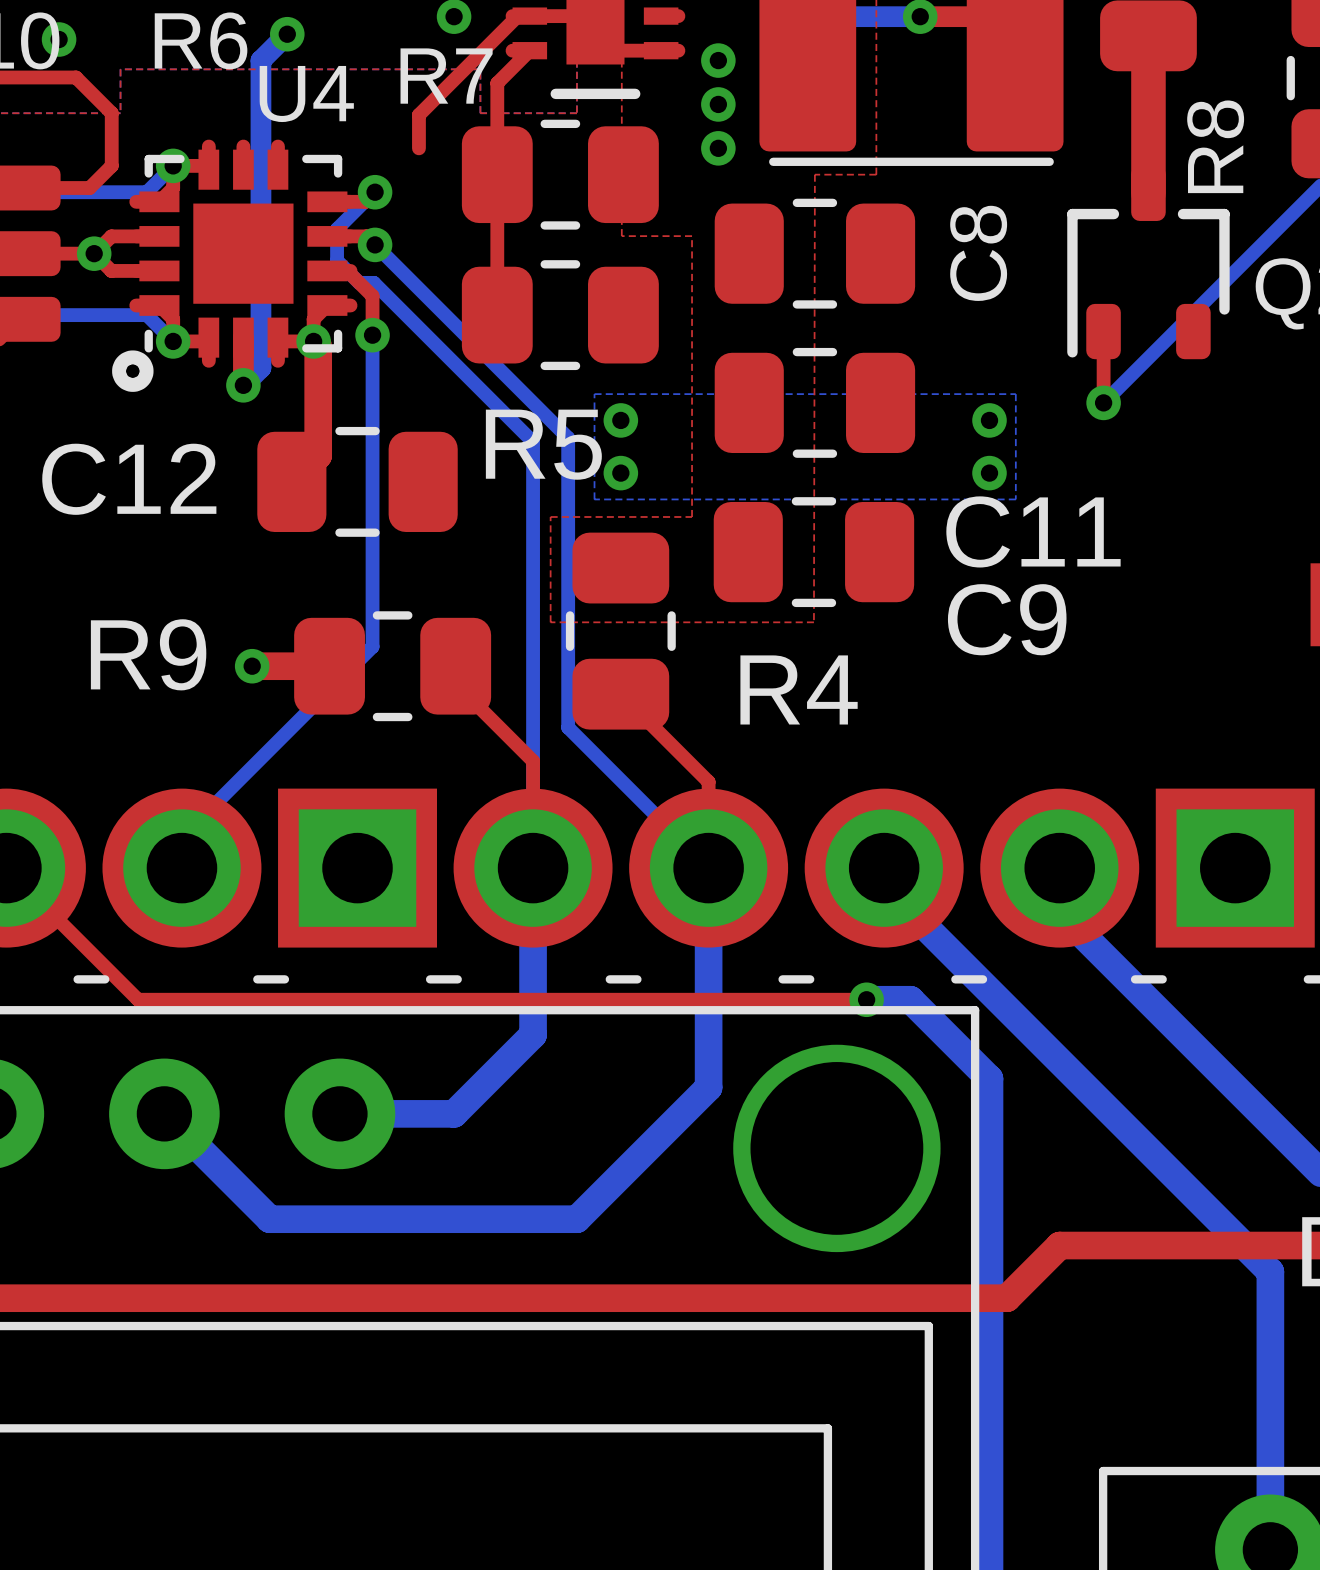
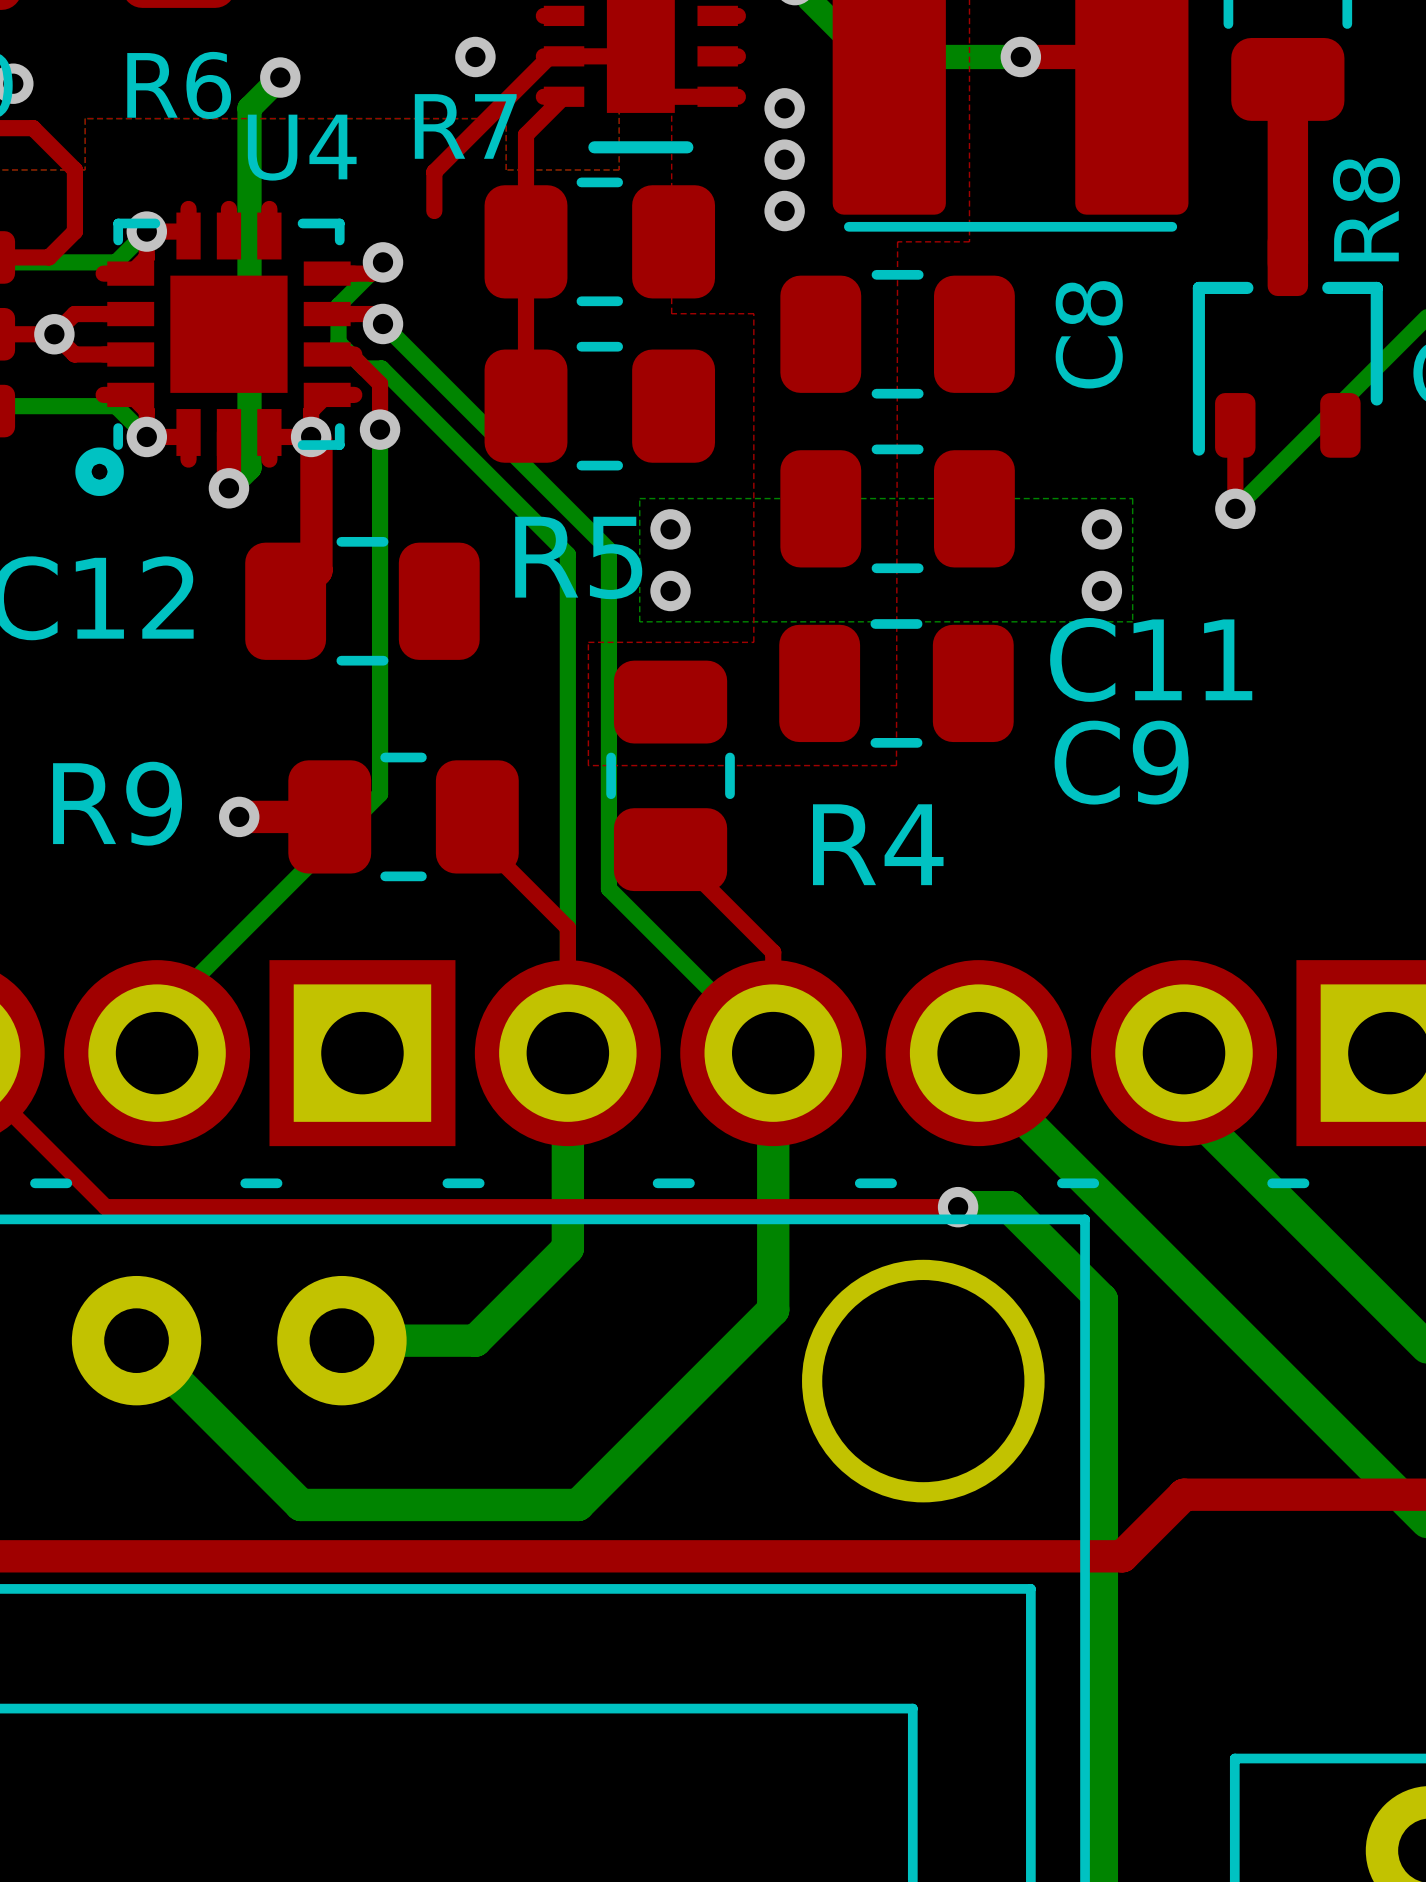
bottom track: (269, 1219) (576, 1219) -> (259, 1463) (300, 1504) (578, 1504) (619, 1463)

